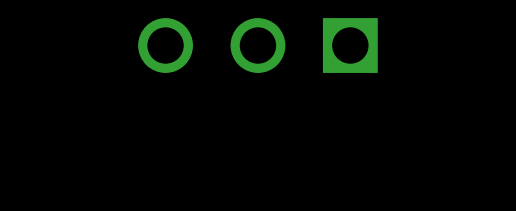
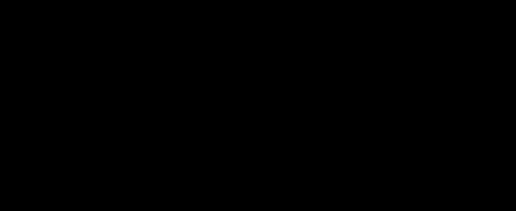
part: (257, 45) -> none

